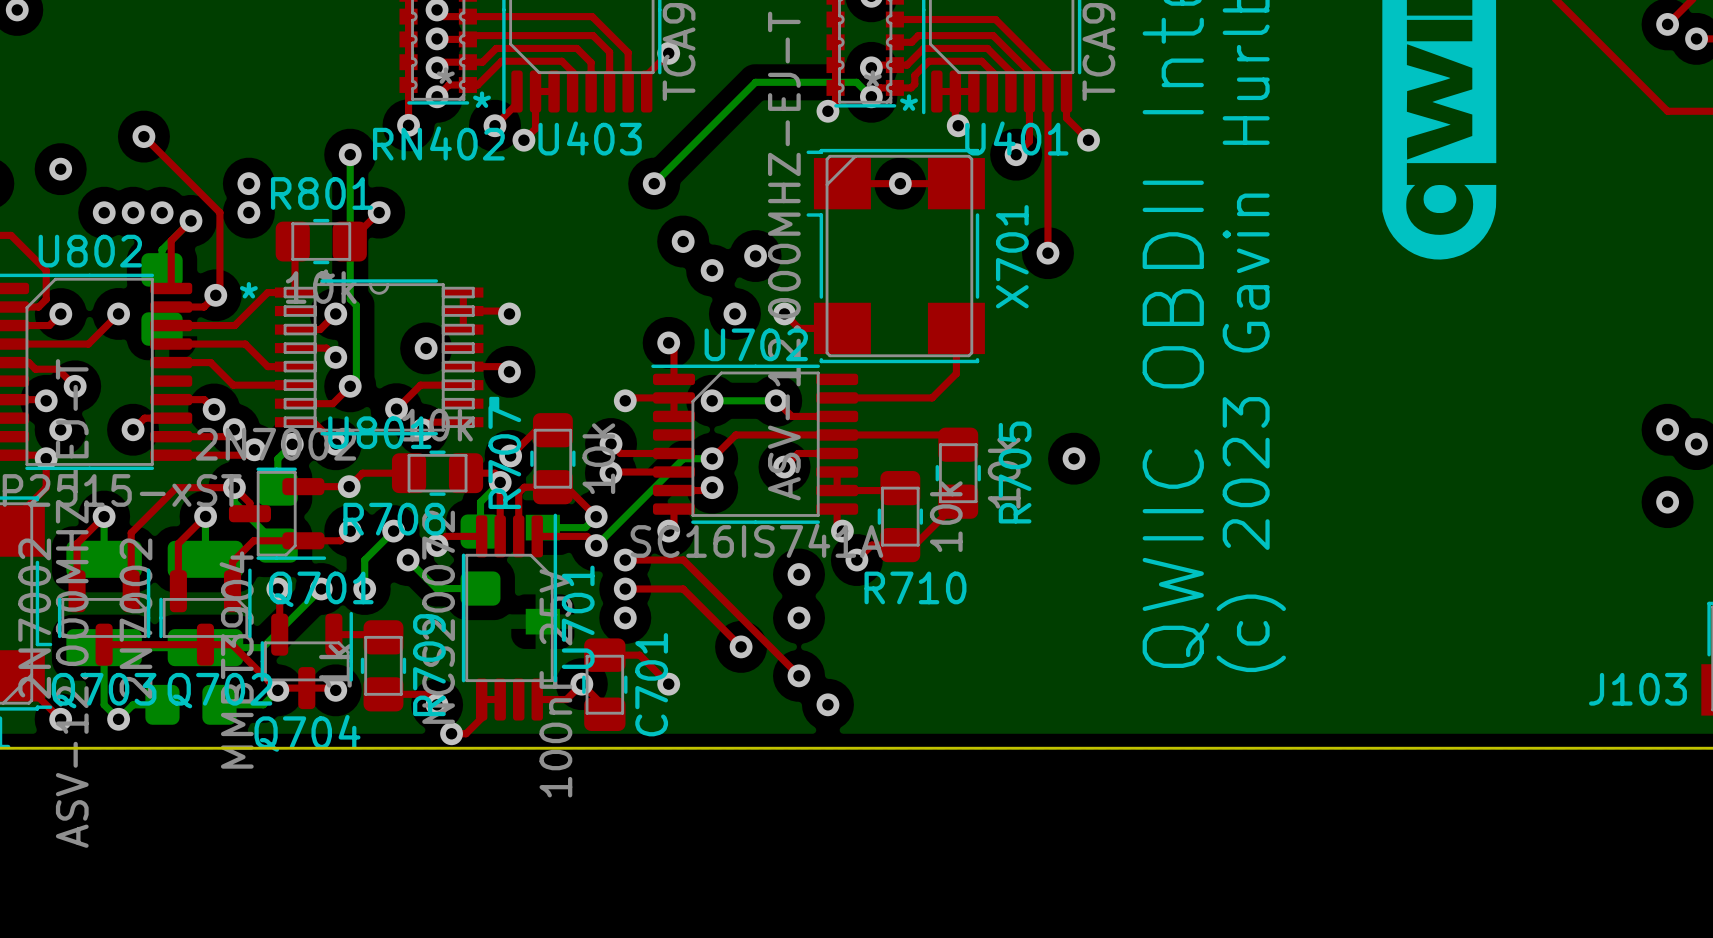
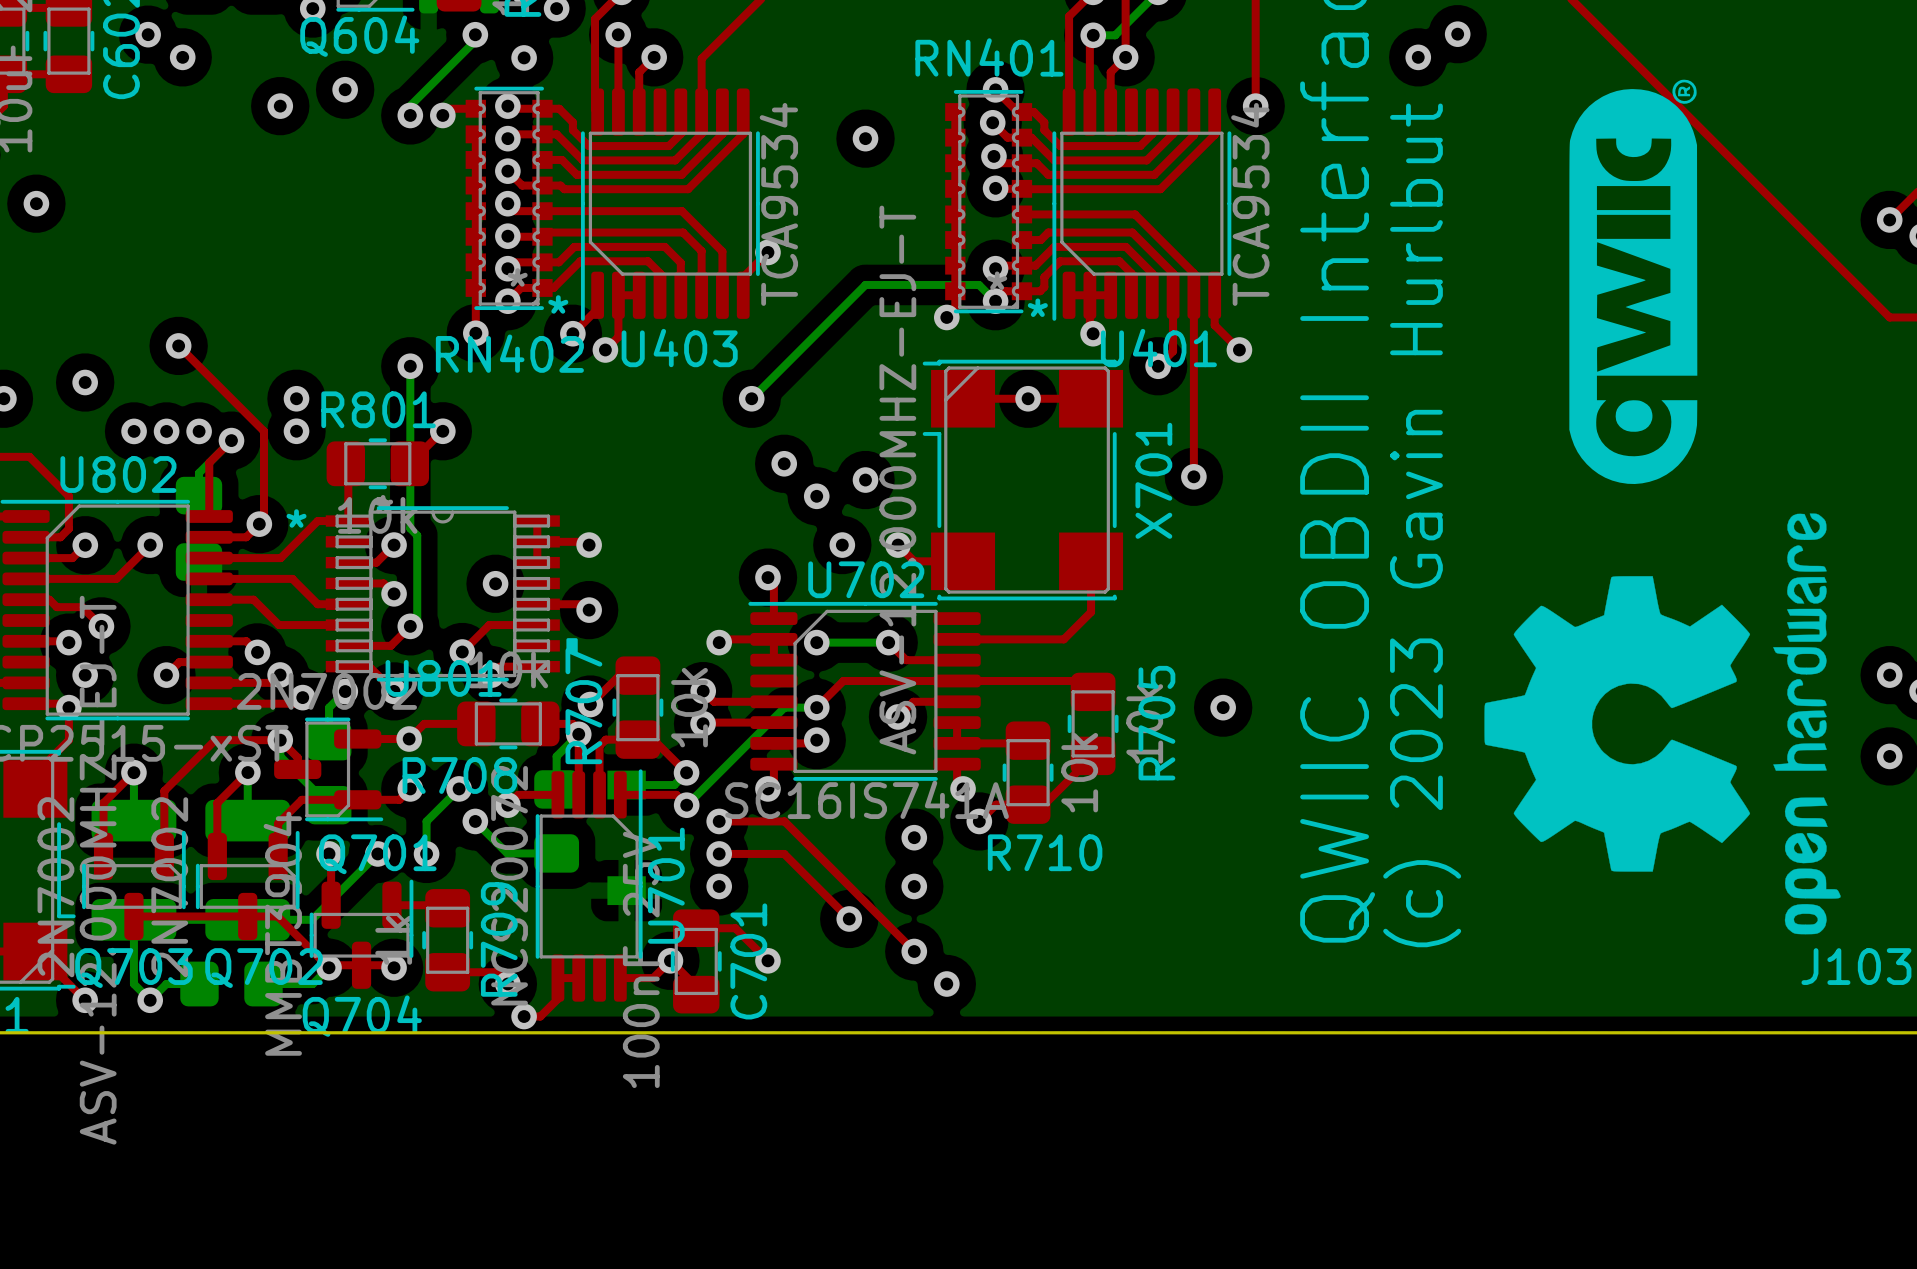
drawing: none -> [1484, 513, 1841, 935]

